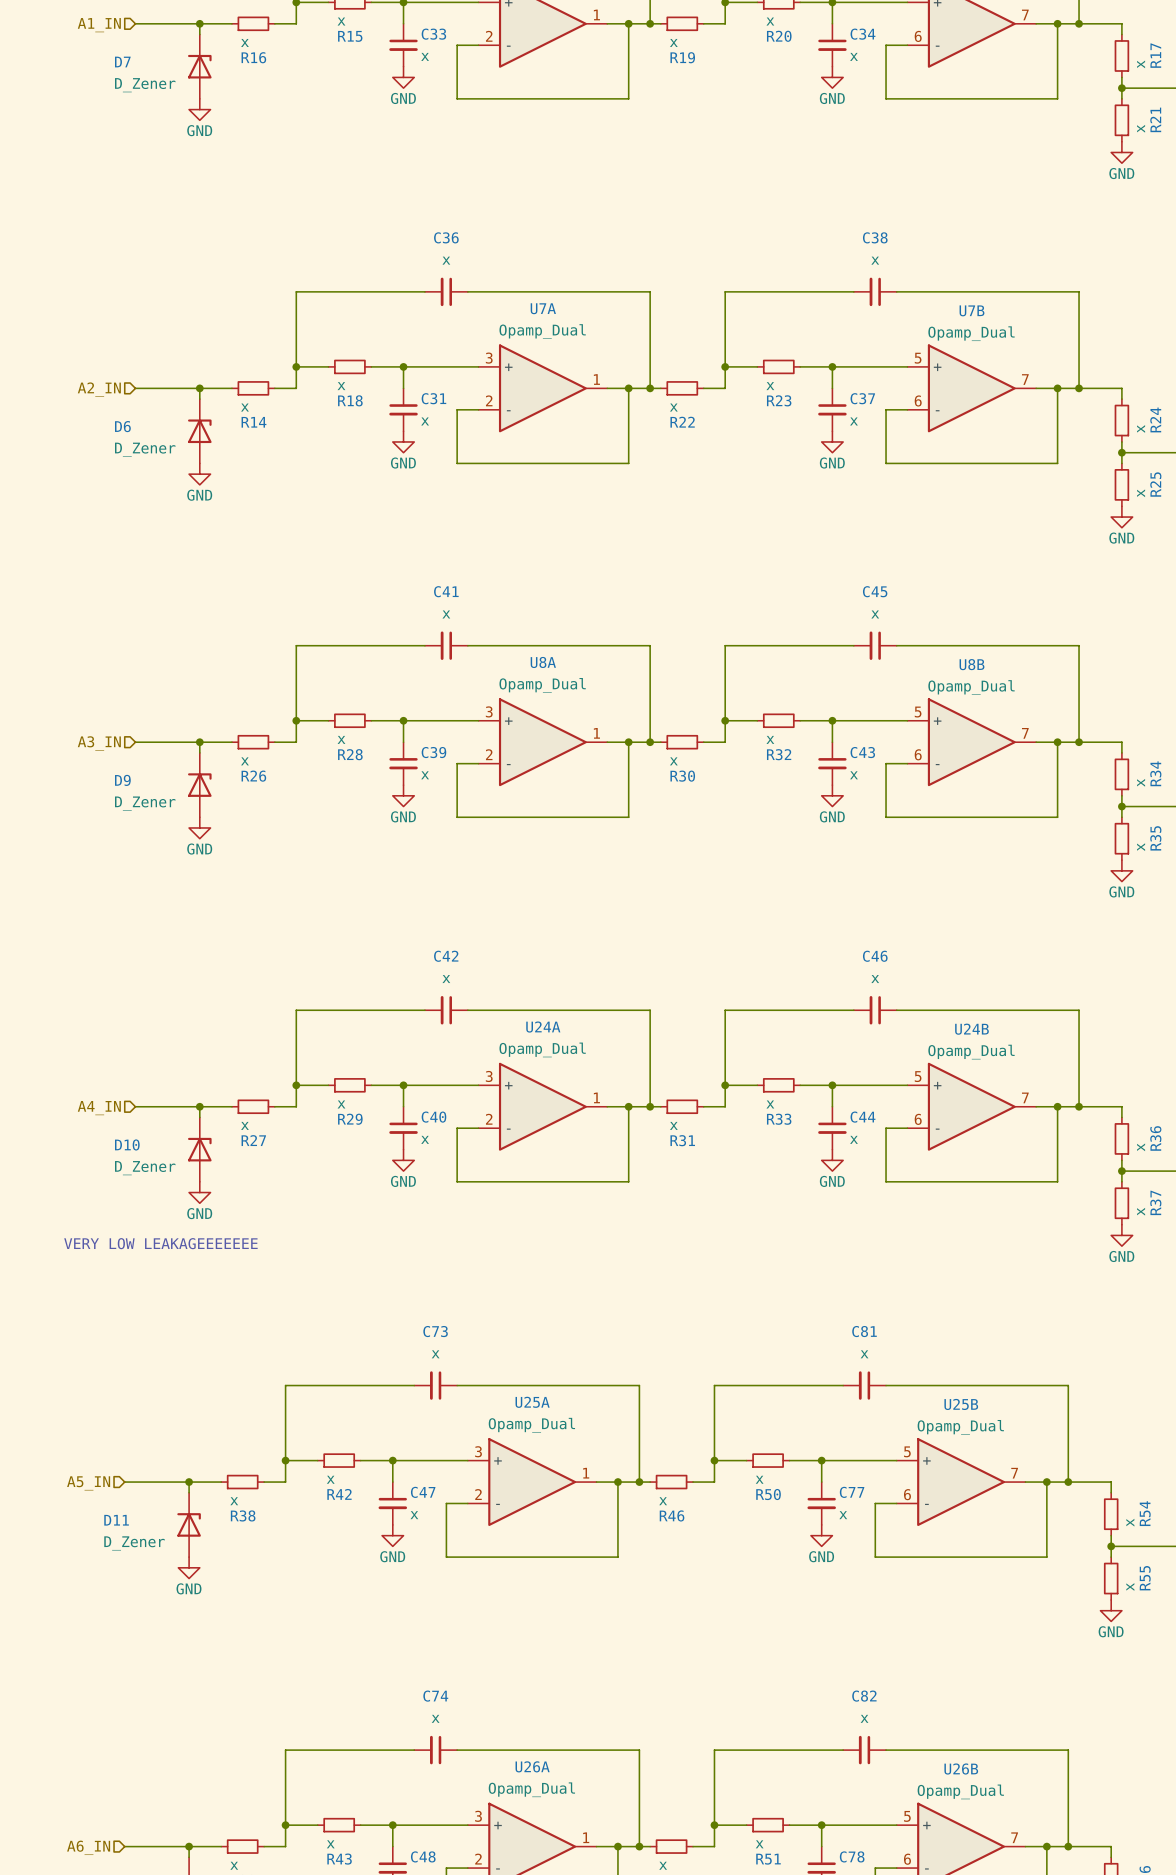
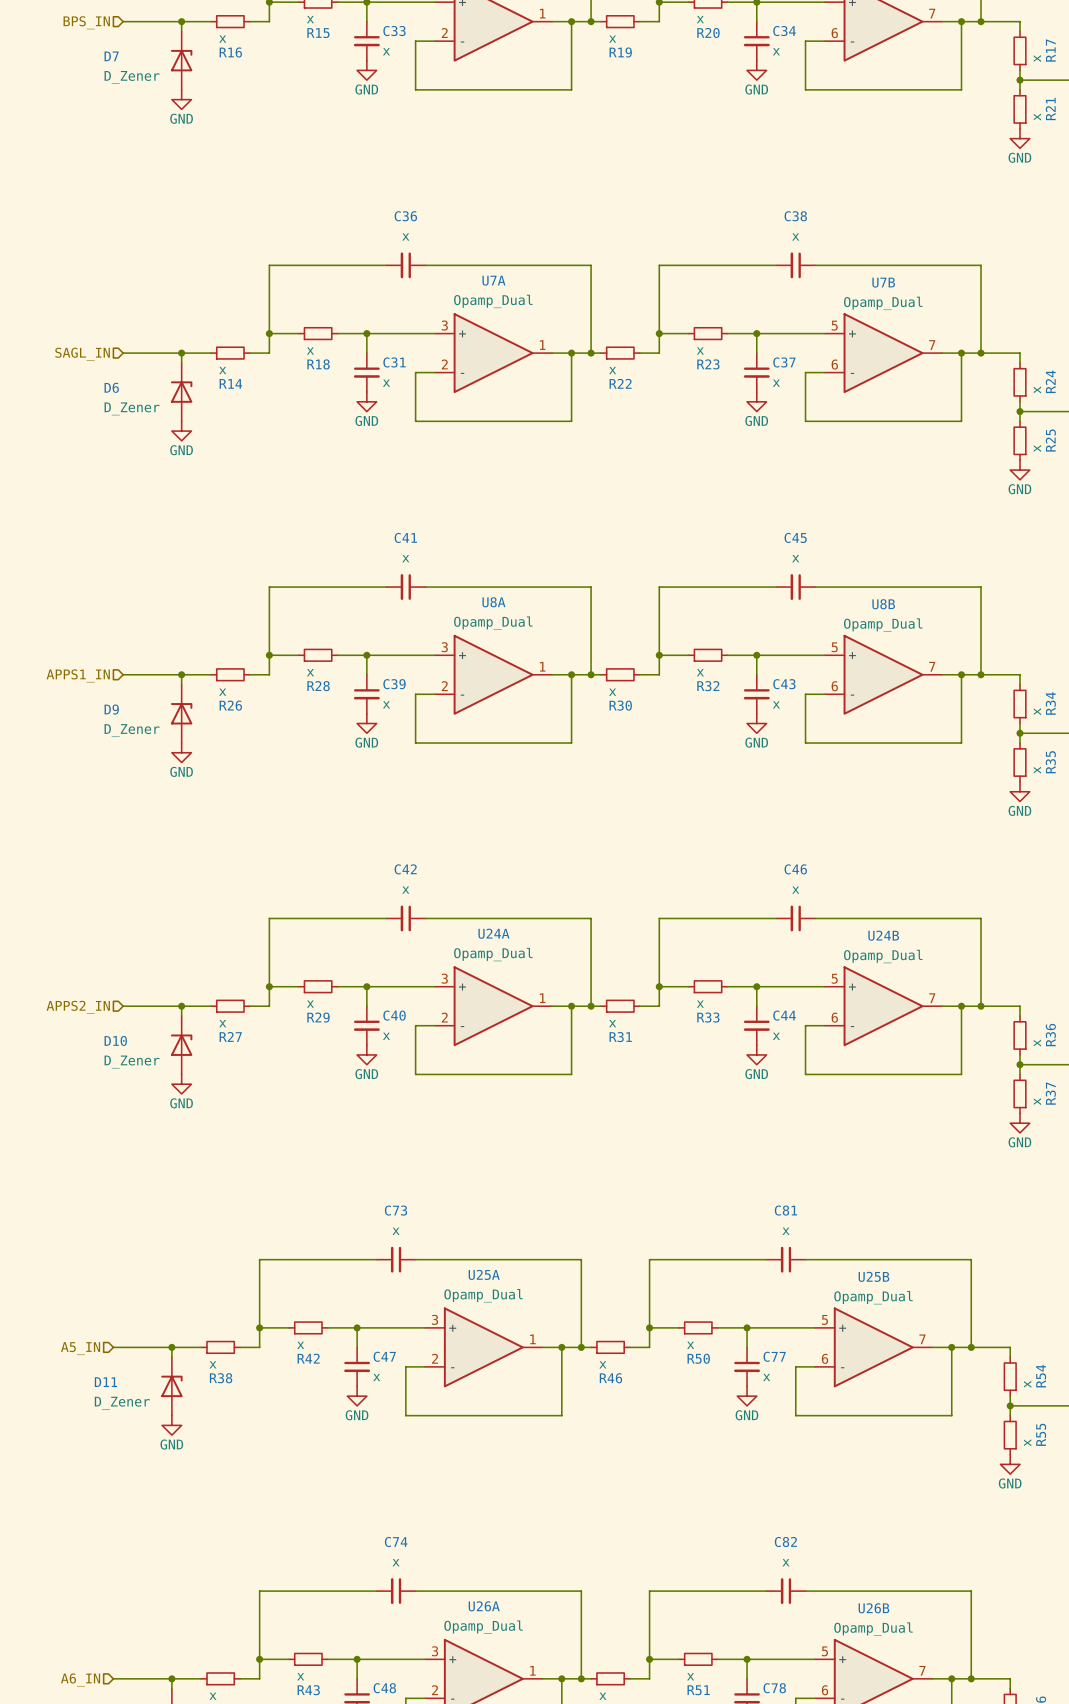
hierarchical label: A1_IN (99, 25) -> BPS_IN (86, 22)
hierarchical label: A2_IN (99, 389) -> SAGL_IN (82, 354)
hierarchical label: A3_IN (99, 743) -> APPS1_IN (78, 675)
hierarchical label: A4_IN (99, 1108) -> APPS2_IN (78, 1007)
text: VERY LOW LEAKAGEEEEEEE (160, 1243) -> none

